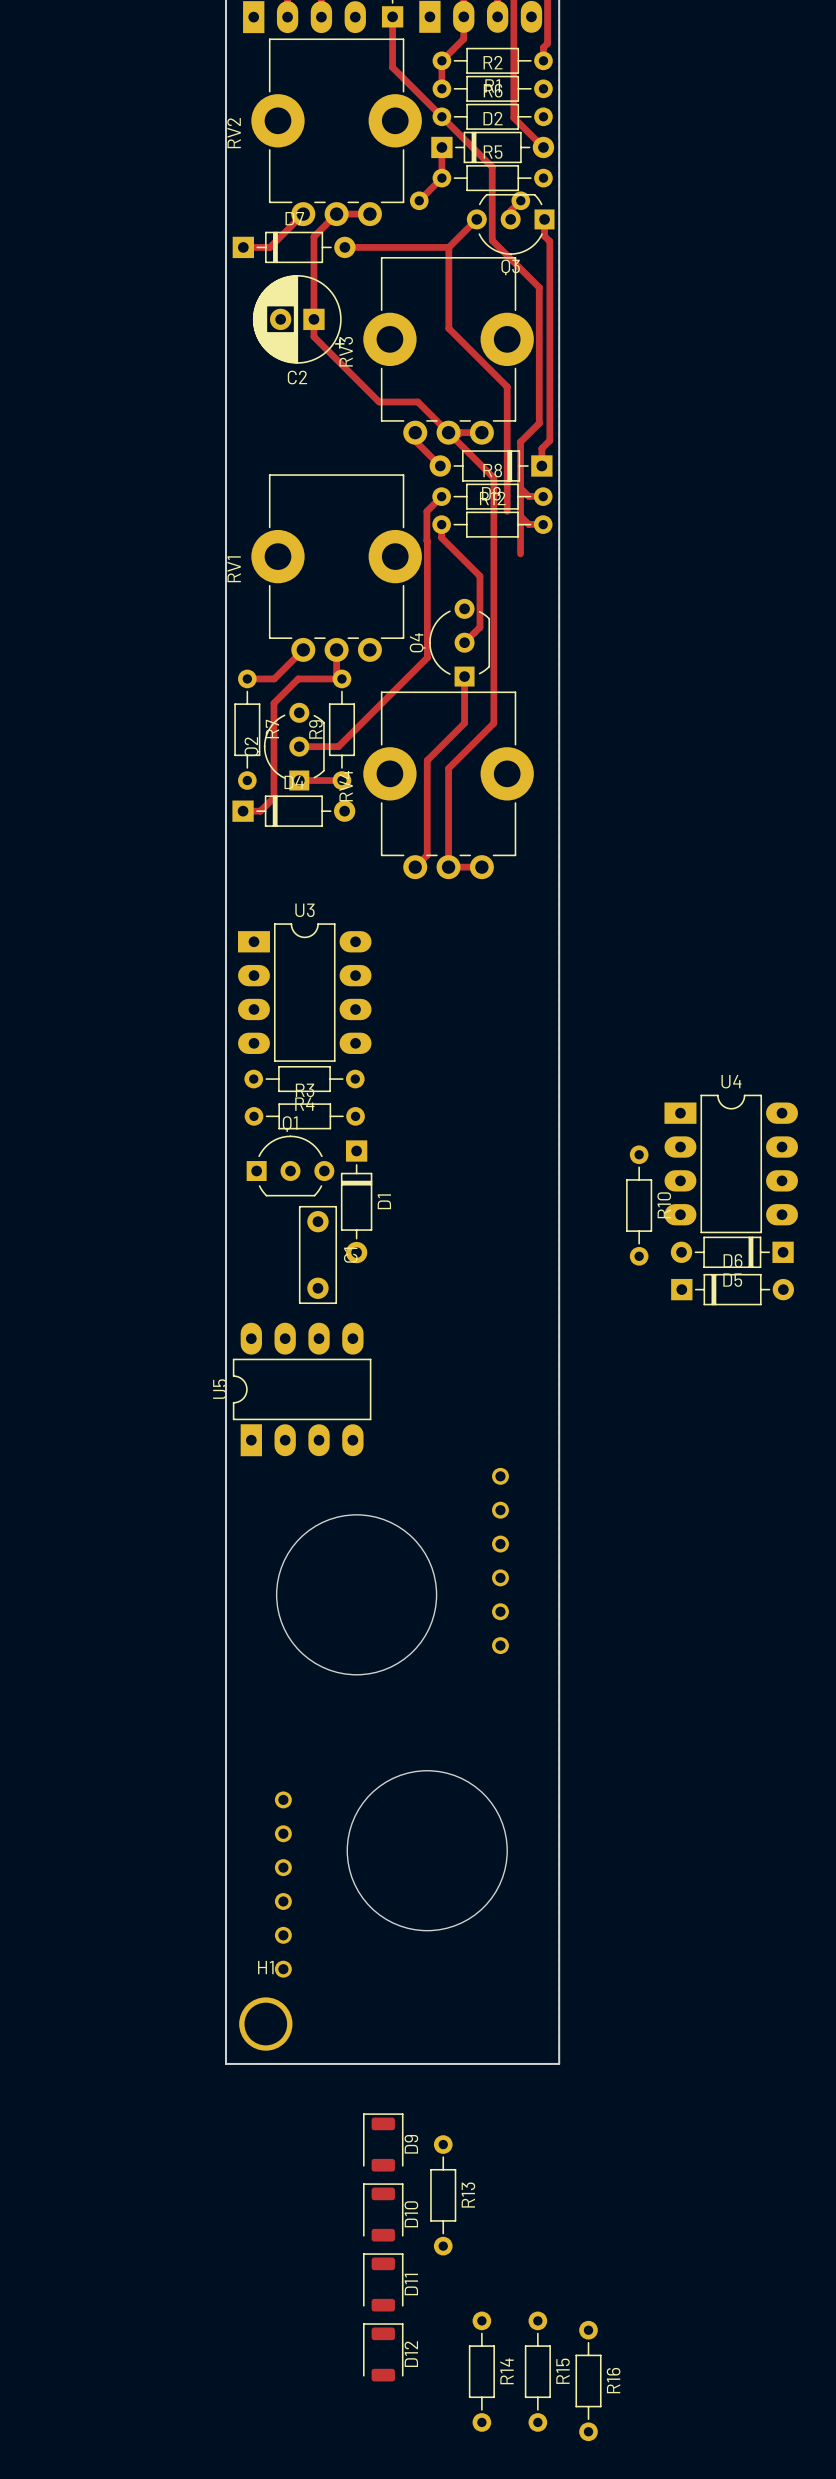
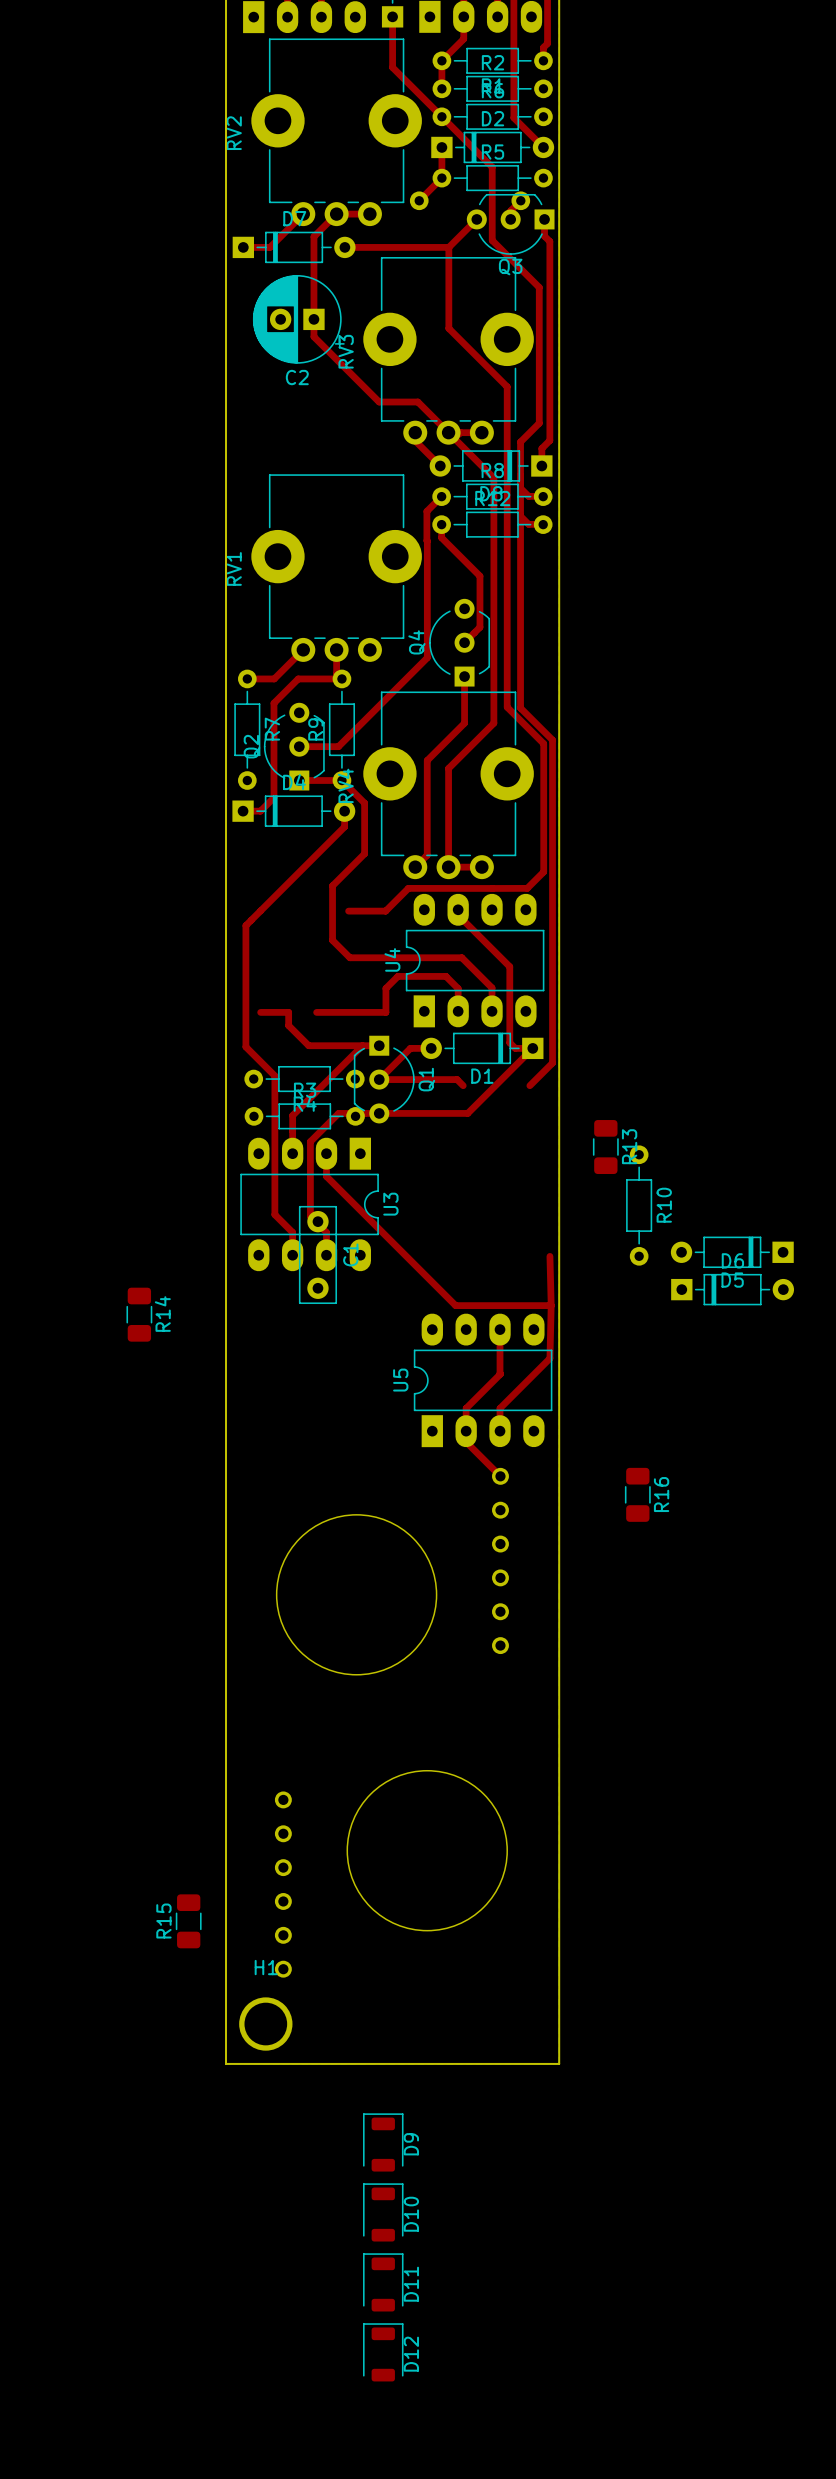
top track: none -> (507, 511) (507, 707) (543, 743) (543, 871) (527, 888) (408, 888) (385, 911) (348, 911)
top track: none -> (520, 553) (520, 708) (552, 740) (552, 1063) (529, 1085)
top track: none -> (341, 780) (364, 803) (364, 853) (332, 885) (332, 940) (349, 957) (461, 957) (492, 987) (492, 1011)
top track: none -> (344, 811) (344, 826) (245, 925) (245, 1046) (274, 1075) (274, 1214) (292, 1232) (292, 1255)
top track: none -> (458, 909) (458, 915) (509, 966) (509, 1042) (515, 1048) (532, 1048) (467, 1113) (338, 1113) (310, 1141) (310, 1216) (326, 1232) (326, 1255)
U3 rotation: 0° (304, 992) -> 90° clockwise (309, 1204)
U3 position: (304, 992) -> (309, 1204)
top track: none -> (458, 1011) (458, 988) (446, 976) (397, 976) (385, 988) (385, 1012) (316, 1012)
top track: none -> (260, 1012) (288, 1012) (288, 1025) (308, 1045) (379, 1045)
top track: none -> (362, 1045) (292, 1115) (292, 1153)
top track: none -> (431, 1048) (410, 1048) (379, 1079) (457, 1079) (463, 1085)
top track: none -> (326, 1153) (326, 1176) (455, 1305) (551, 1305)
U4 rotation: 0° (731, 1163) -> 90° counterclockwise (475, 960)
U4 position: (731, 1163) -> (475, 960)
Q1 rotation: 0° (290, 1166) -> 90° clockwise (384, 1079)
Q1 position: (290, 1166) -> (384, 1079)
D1 rotation: 0° (356, 1201) -> 90° clockwise (482, 1048)
D1 position: (356, 1201) -> (482, 1048)
top track: none -> (549, 1256) (551, 1305)
top track: none -> (551, 1305) (549, 1358) (500, 1408) (500, 1431)
top track: none -> (500, 1329) (500, 1374) (466, 1408) (466, 1442) (500, 1476)
U5 position: (302, 1389) -> (483, 1380)
R13 footprint: [430, 2135, 457, 2256] -> [592, 1120, 619, 1175]
R14 footprint: [468, 2311, 495, 2432] -> [126, 1287, 153, 1342]
R15 footprint: [524, 2311, 551, 2432] -> [175, 1894, 202, 1949]
R16 footprint: [575, 2320, 602, 2442] -> [624, 1467, 651, 1522]
R15 name position: R15 (563, 2371) -> R15 (163, 1921)

